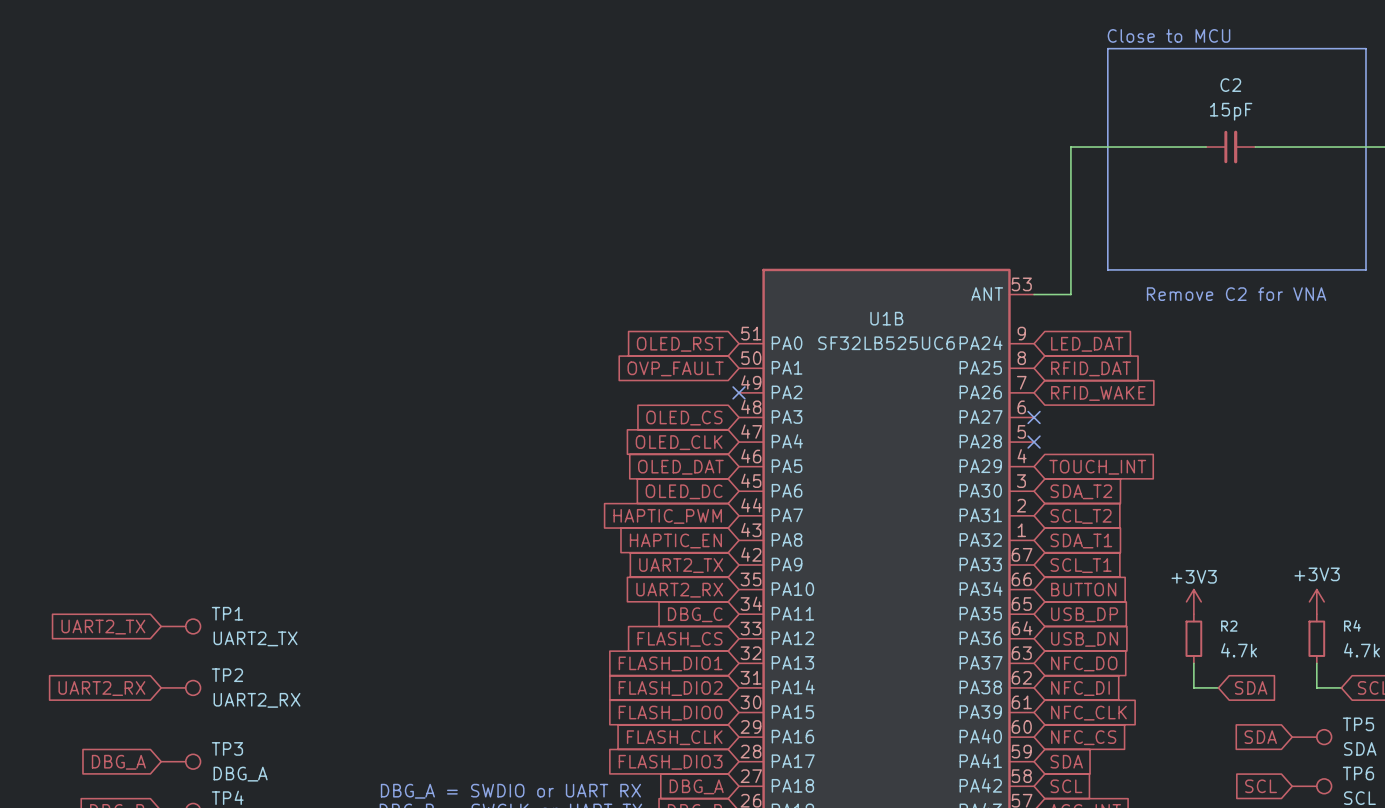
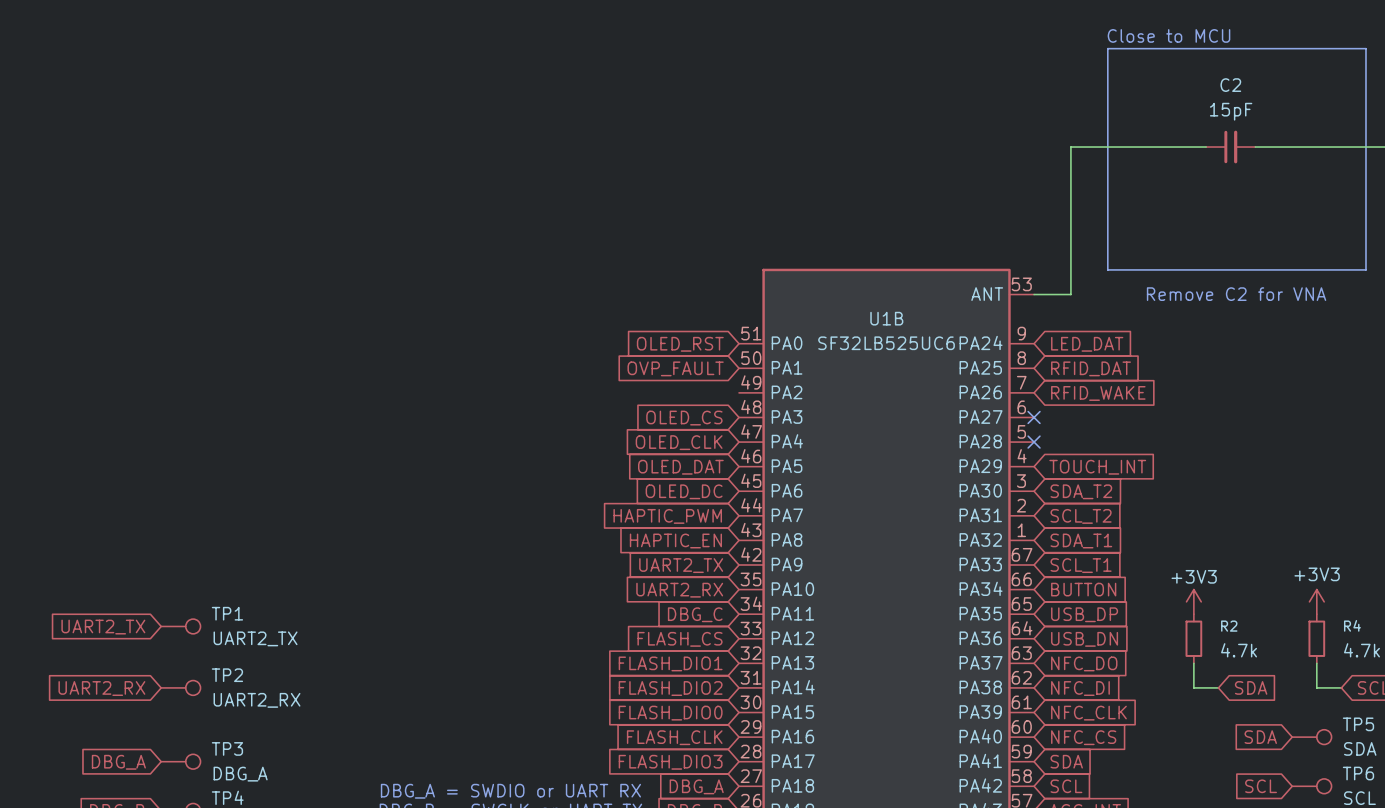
no-connect mark: (739, 392) -> none

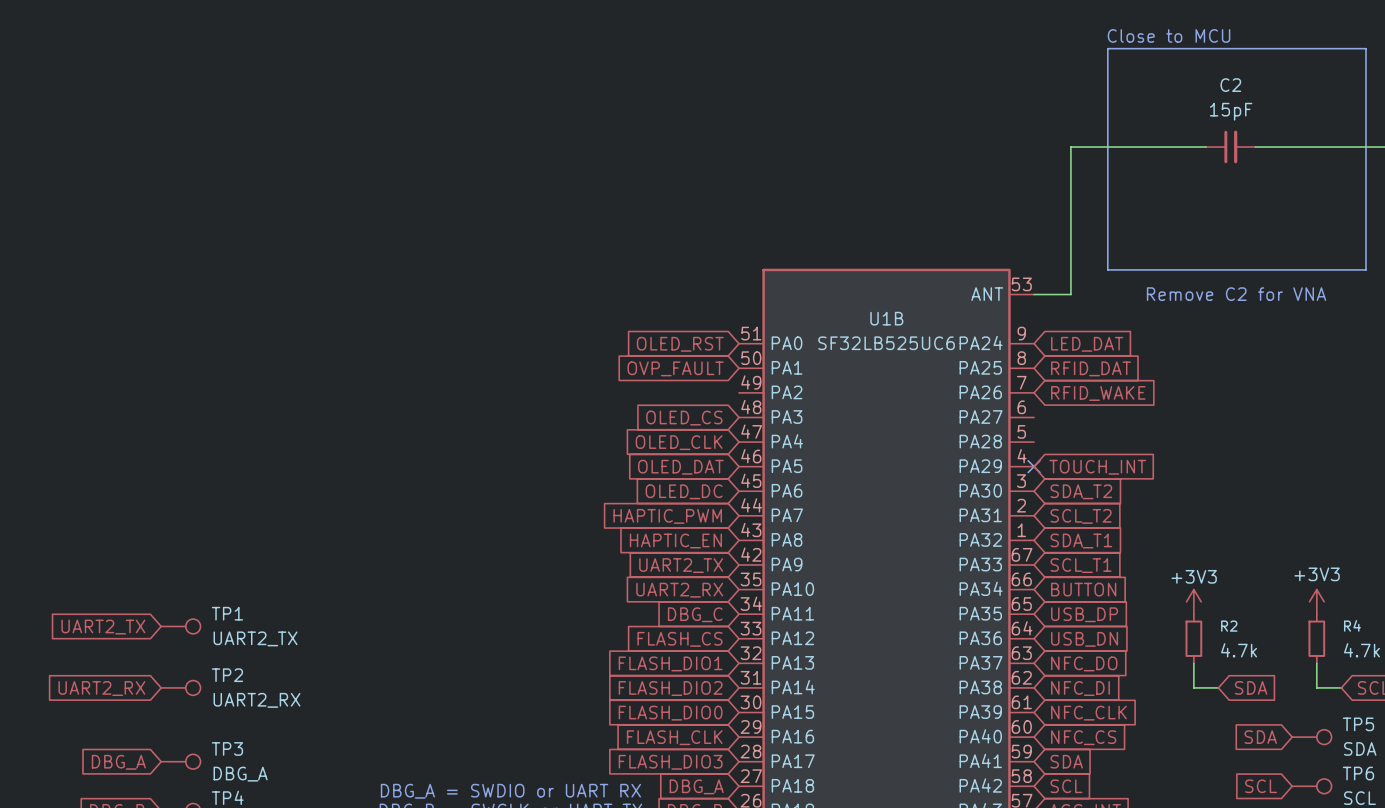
no-connect mark: (1034, 417) -> none
no-connect mark: (1034, 442) -> none
no-connect mark: none -> (1034, 466)

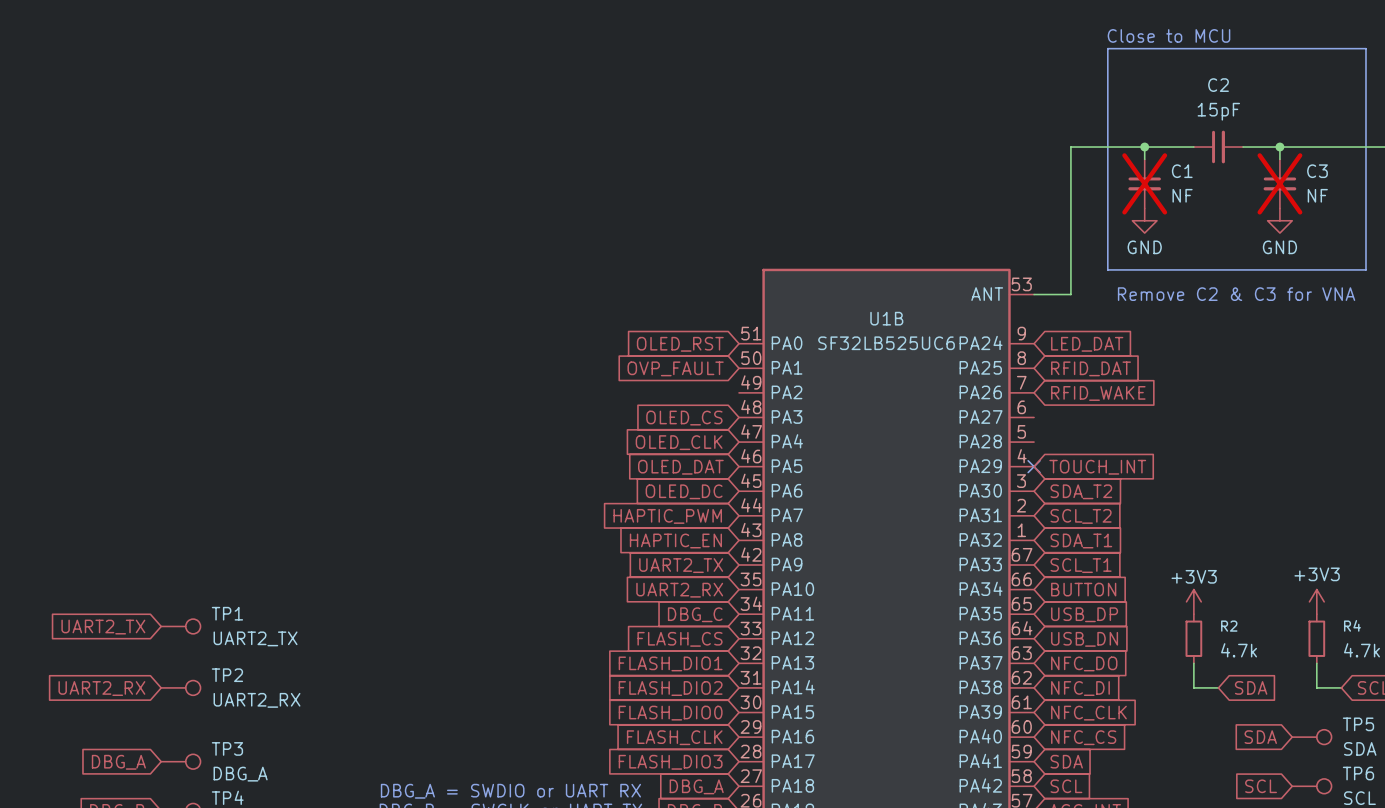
wire: none -> (1144, 147) (1144, 159)
junction: none -> (1144, 147)
C2 position: (1230, 147) -> (1218, 147)
wire: none -> (1279, 147) (1279, 159)
junction: none -> (1279, 147)
C1: none -> NF (1144, 183)
C3: none -> NF (1279, 183)
power symbol: none -> GND (1144, 220)
power symbol: none -> GND (1279, 220)
text: Remove C2 for VNA (1236, 294) -> Remove C2 & C3 for VNA (1236, 294)

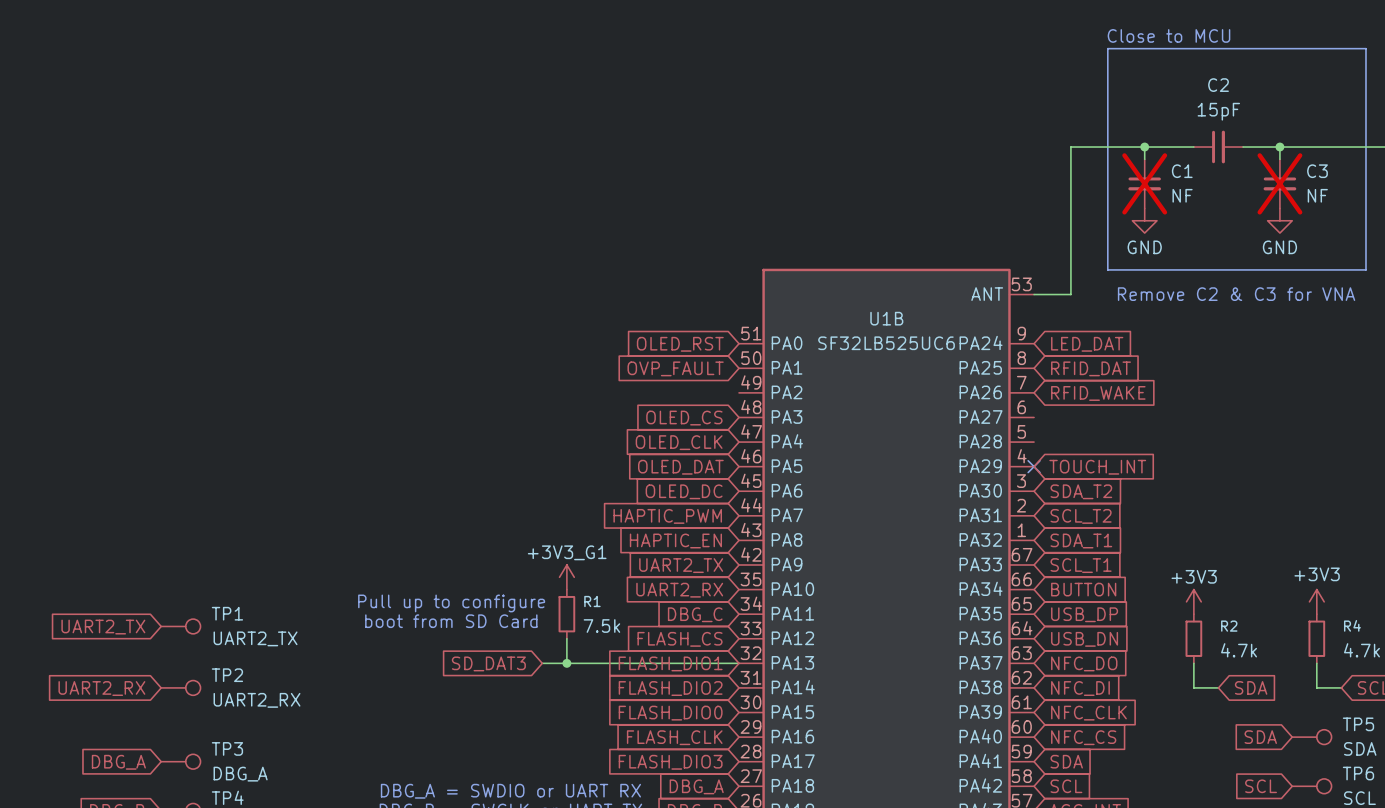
power symbol: none -> +3V3_G1 (566, 577)
text: none -> Pull up to configure (451, 603)
R1: none -> 7.5k (566, 614)
text: none -> boot from SD Card (451, 621)
wire: none -> (566, 638) (566, 663)
global label: none -> SD_DAT3 (488, 663)
wire: none -> (542, 663) (739, 663)
junction: none -> (566, 663)

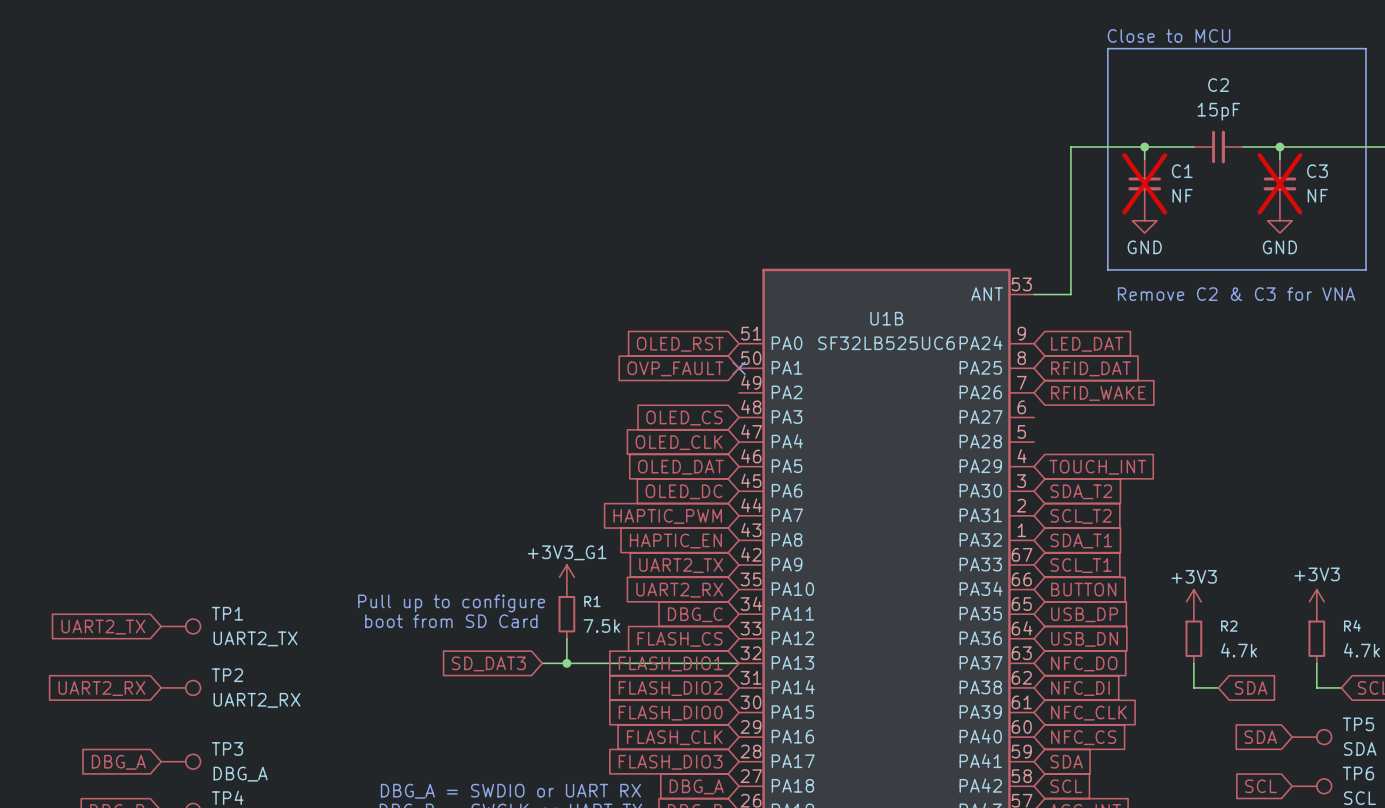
no-connect mark: none -> (739, 368)
no-connect mark: (1034, 466) -> none

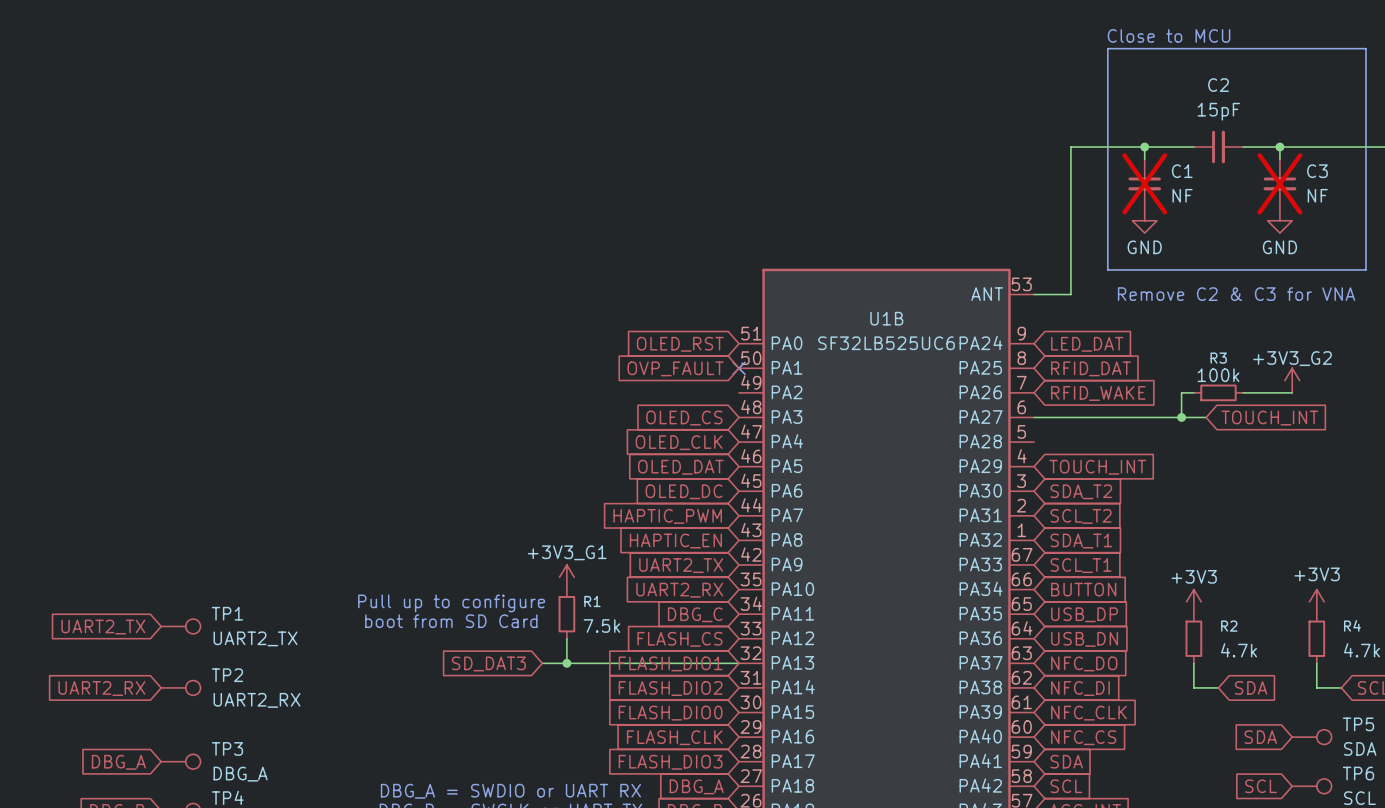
power symbol: none -> +3V3_G2 (1292, 380)
wire: none -> (1193, 392) (1181, 392) (1181, 417)
R3: none -> 100k (1218, 392)
wire: none -> (1243, 392) (1292, 392)
wire: none -> (1034, 417) (1206, 417)
junction: none -> (1181, 417)
global label: none -> TOUCH_INT (1269, 418)

